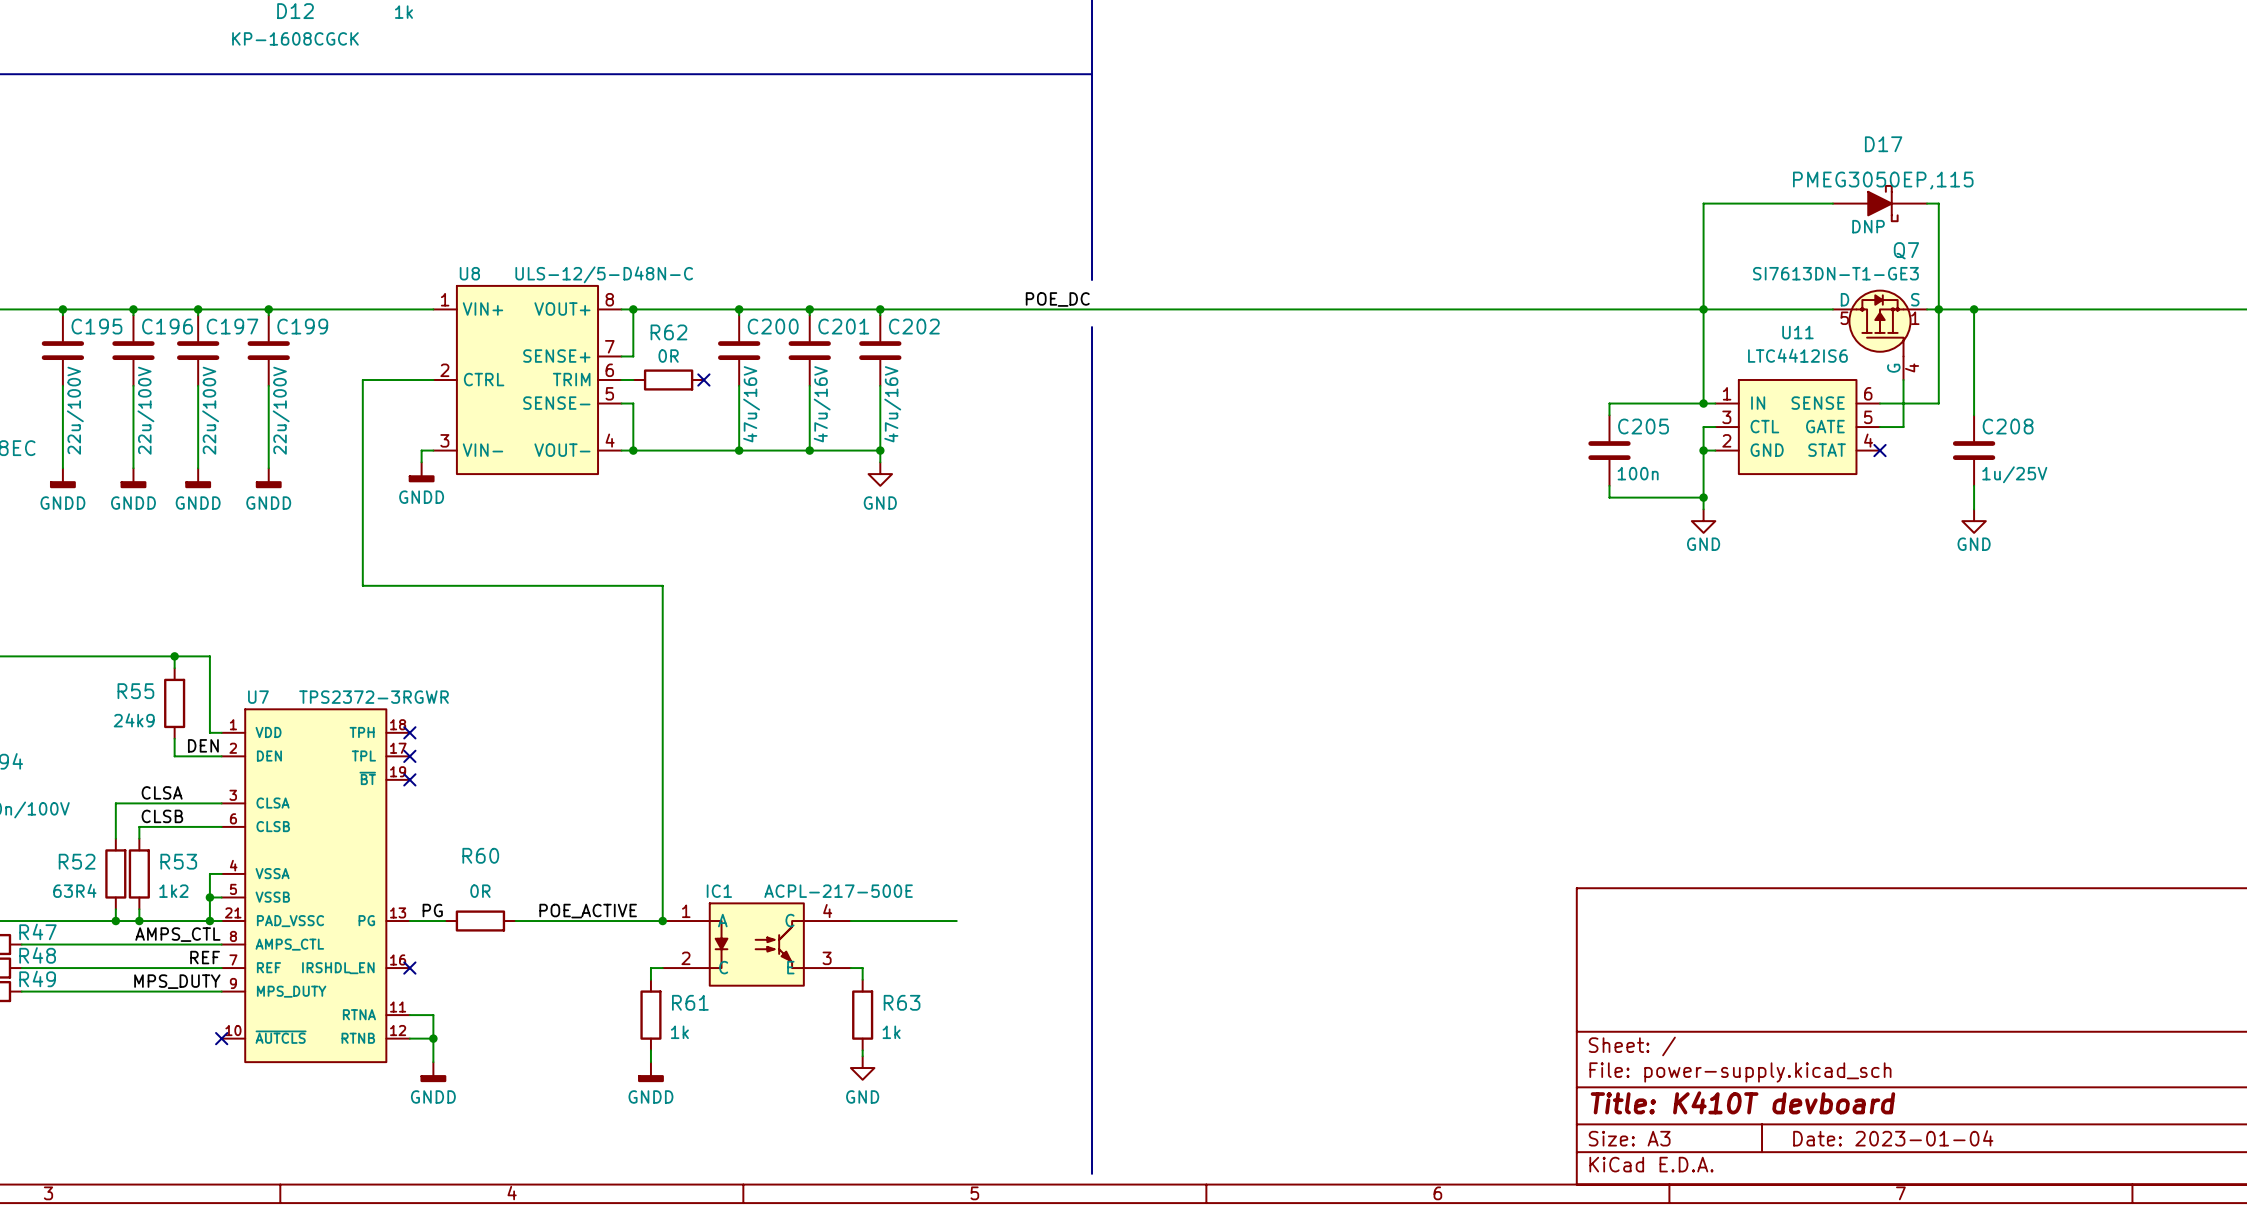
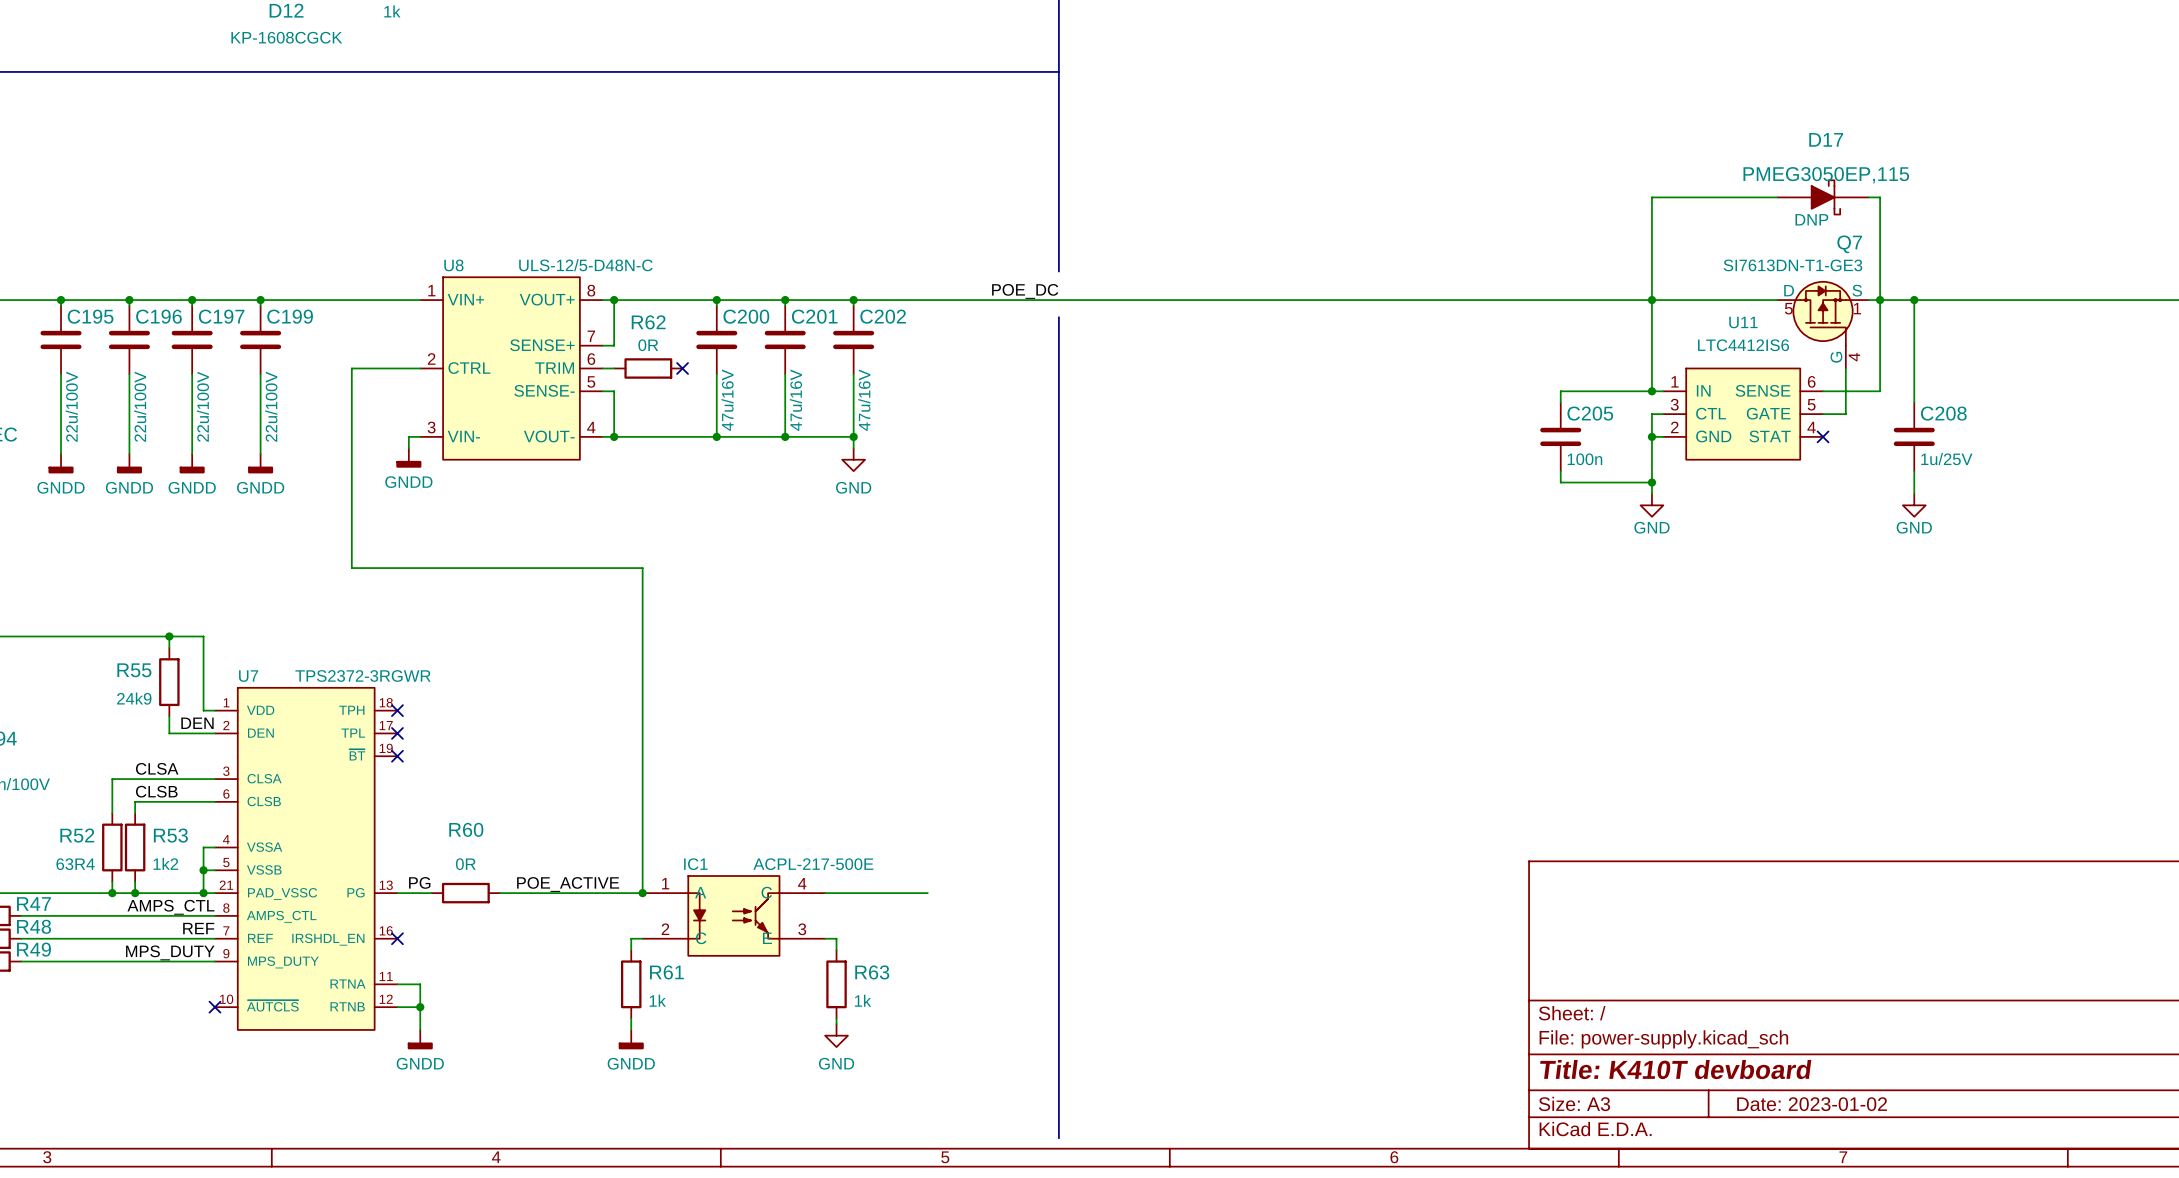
title block: Date: 2023-01-04 (1893, 1138) -> Date: 2023-01-02 (1812, 1104)

